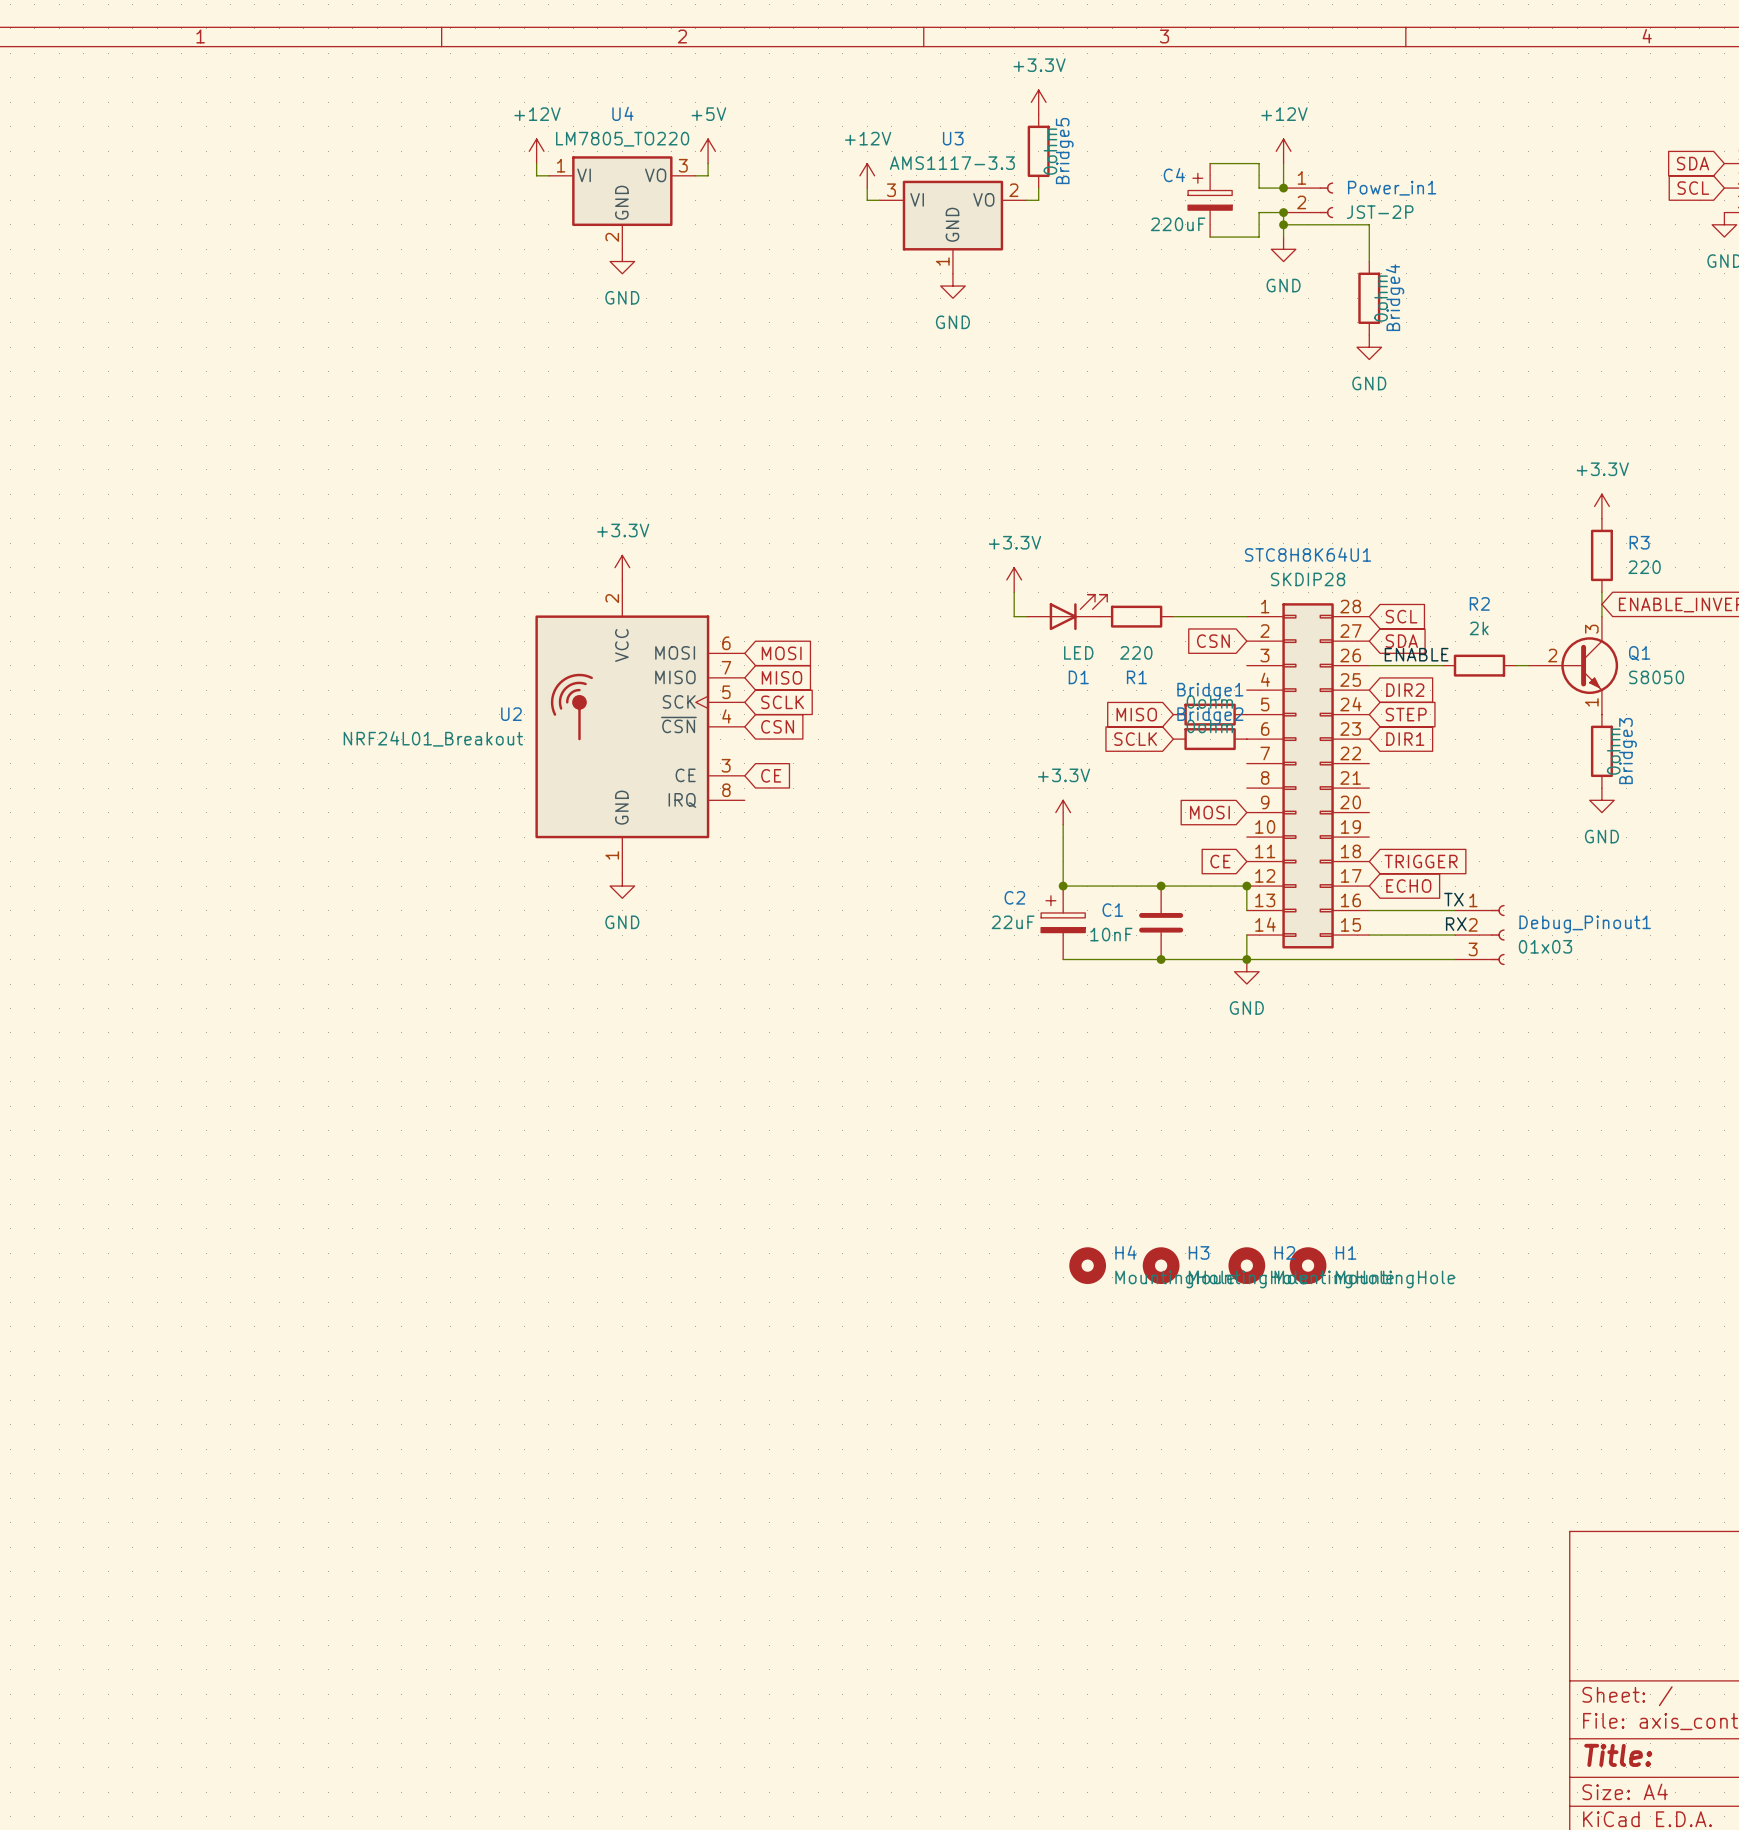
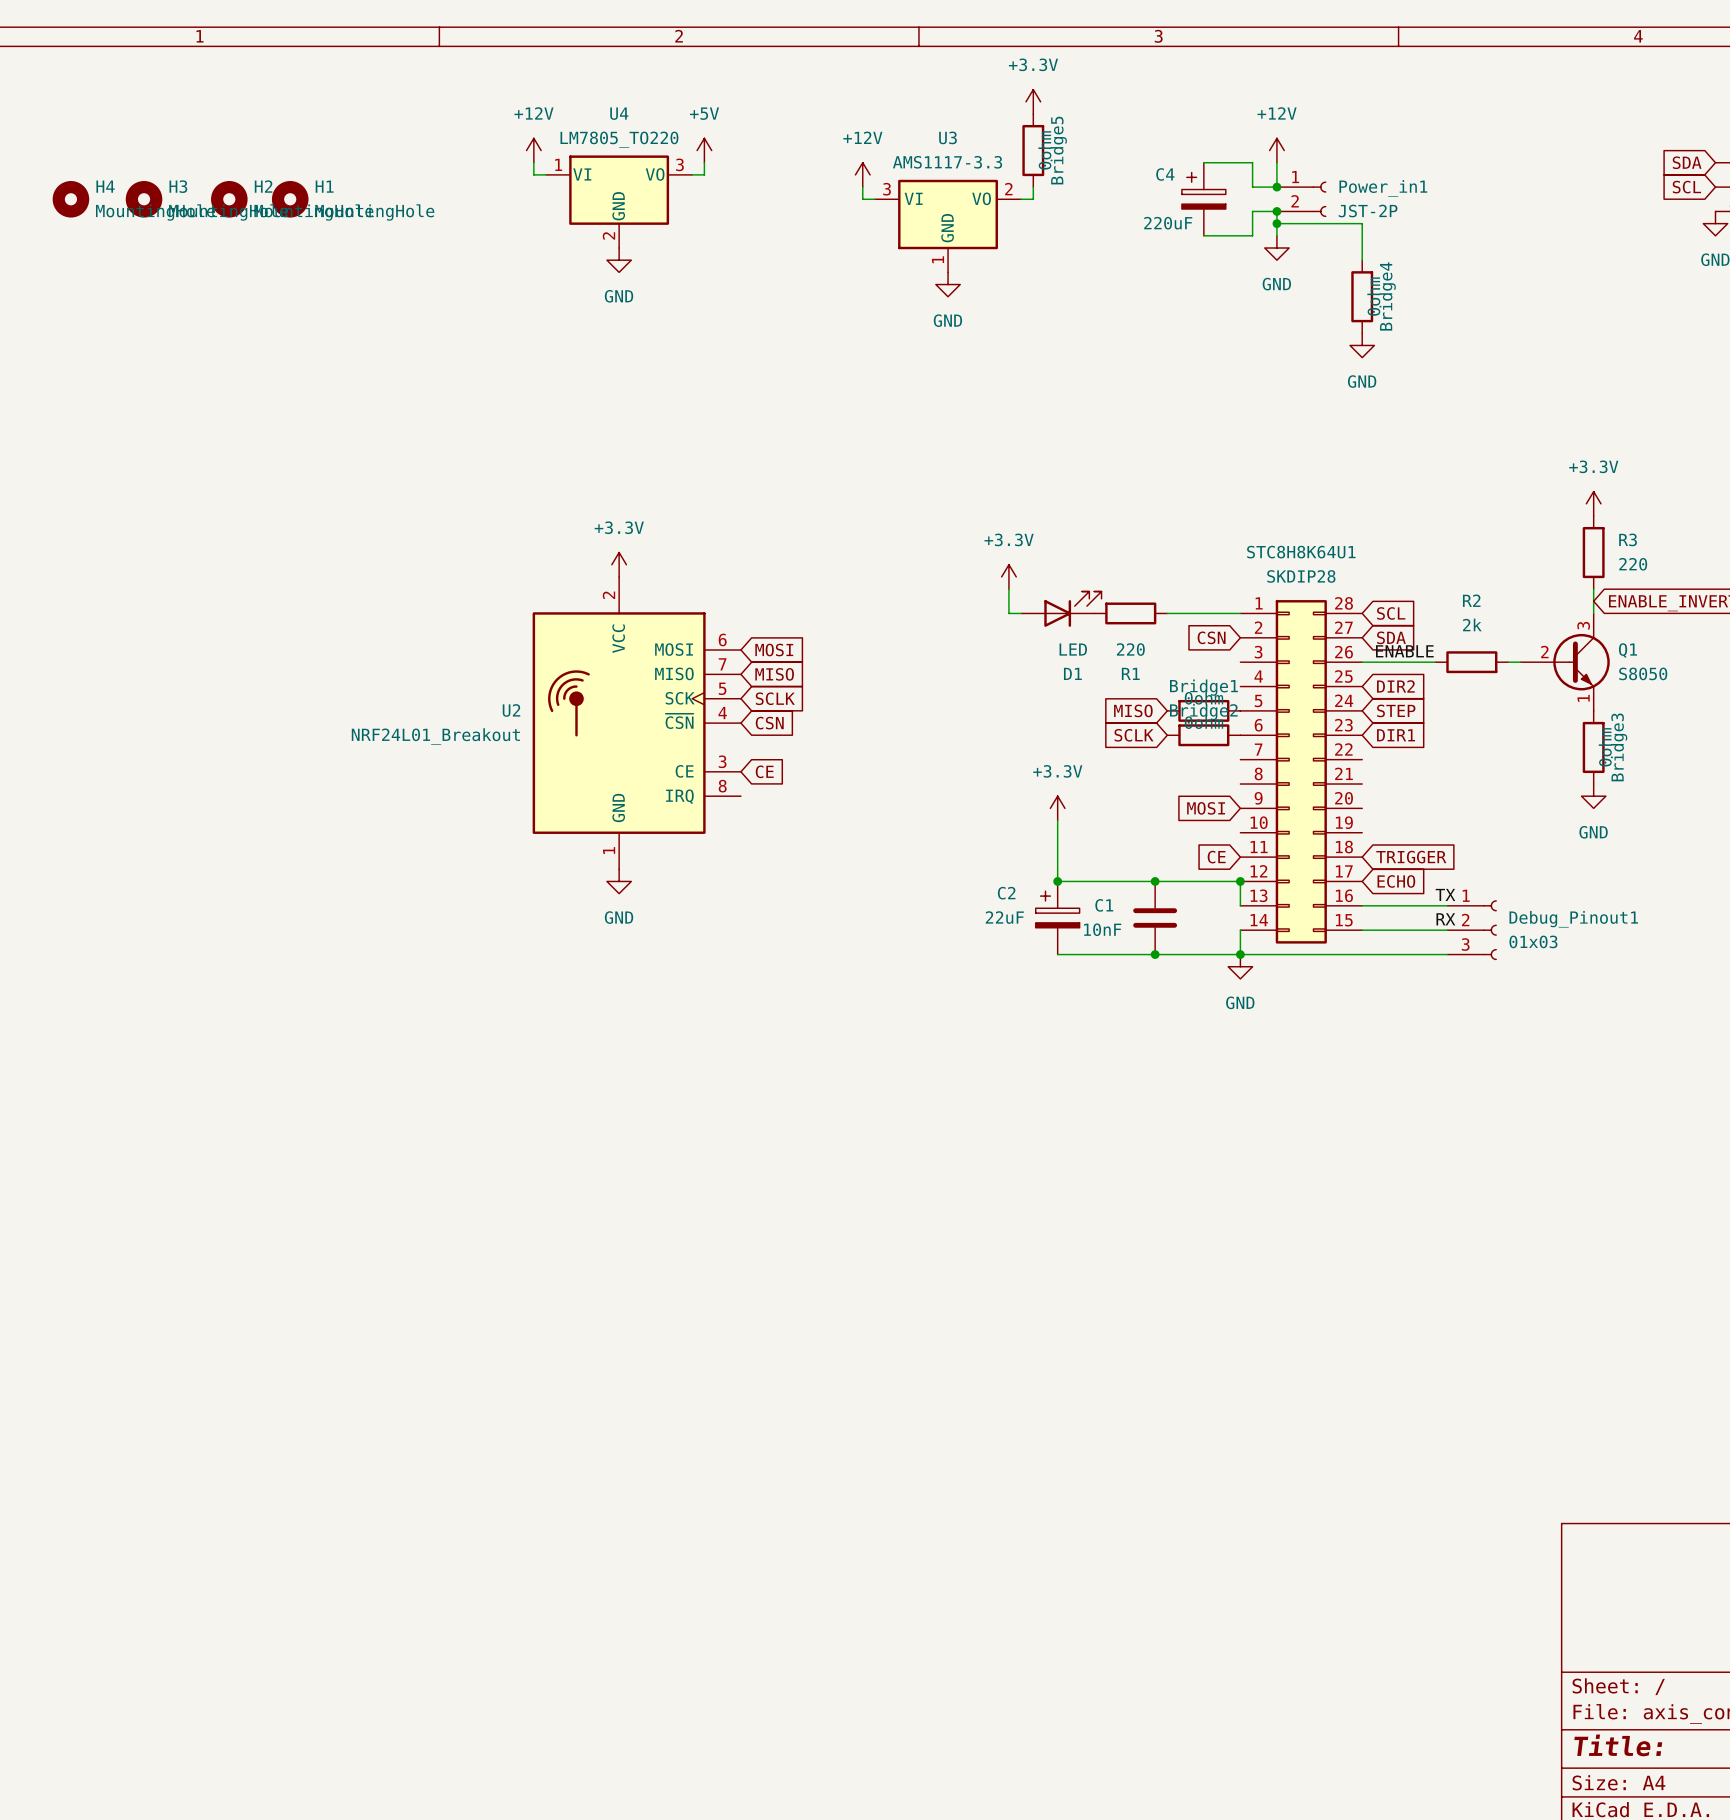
H4 position: (1087, 1265) -> (70, 199)
H3 position: (1161, 1265) -> (144, 199)
H2 position: (1246, 1265) -> (229, 199)
H1 position: (1308, 1265) -> (290, 199)

